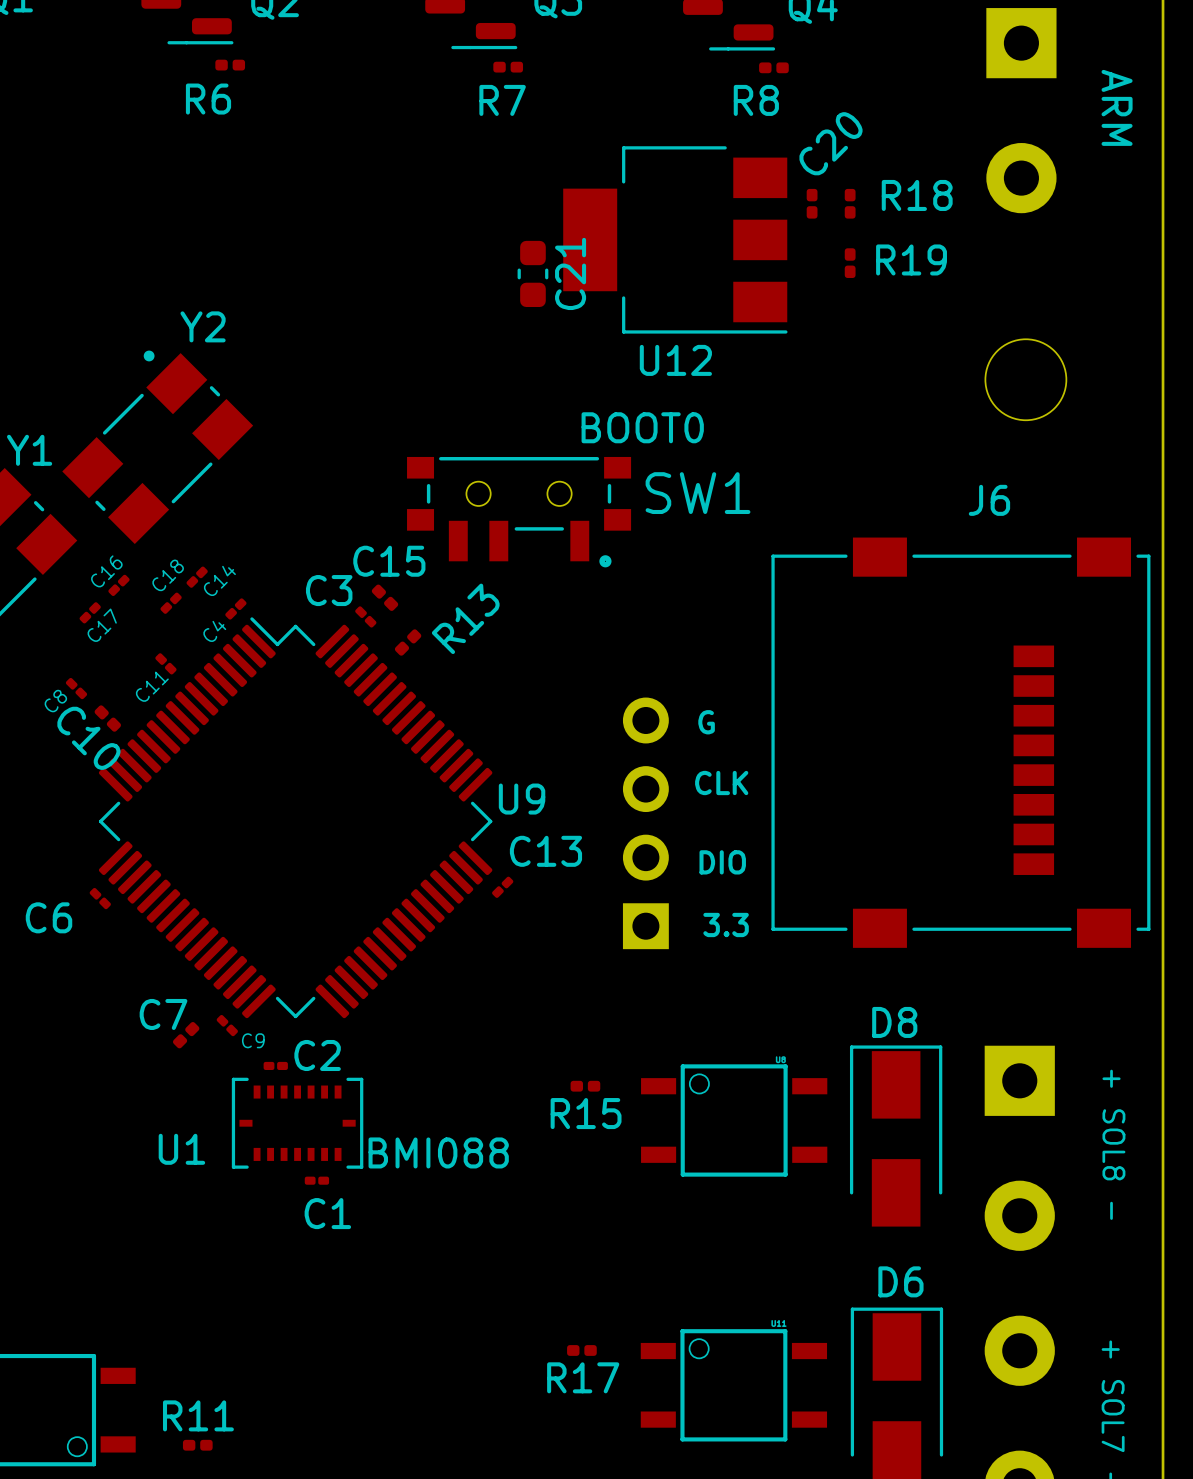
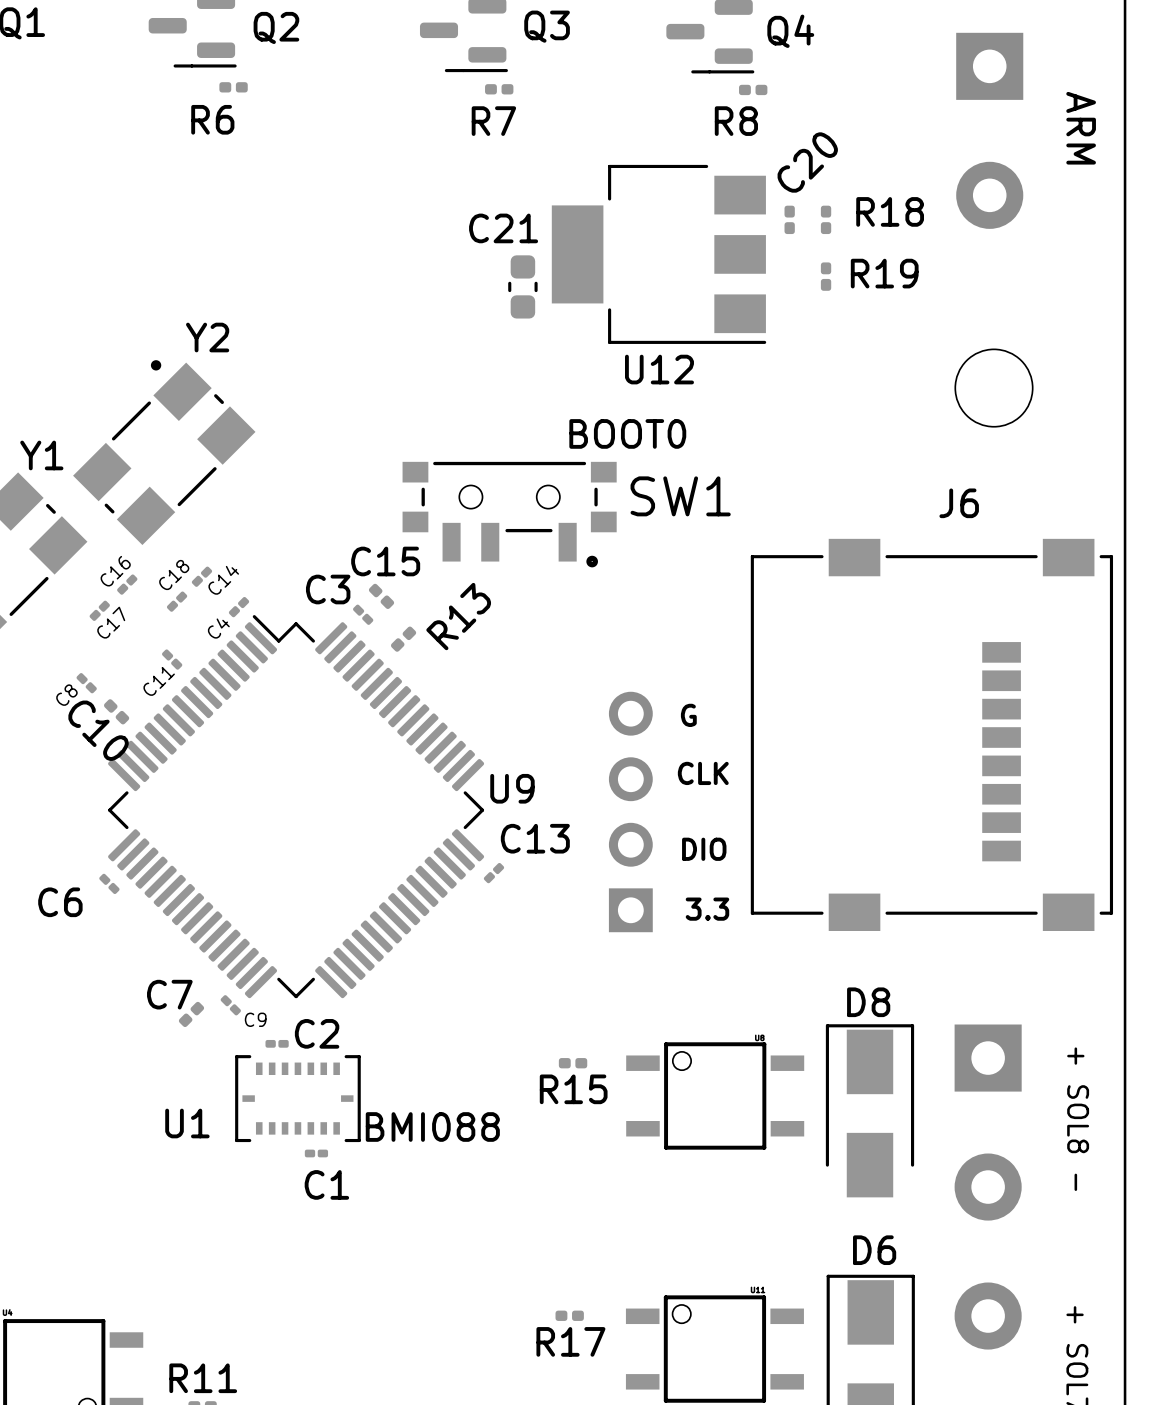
C21 name rotation: 0° (570, 273) -> 90° clockwise (503, 228)

